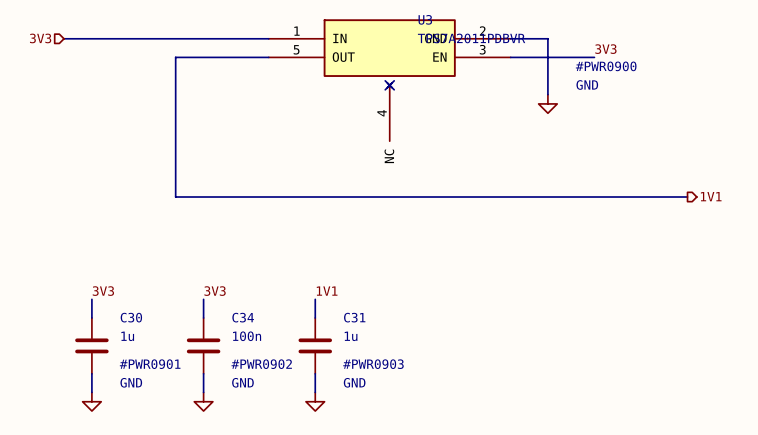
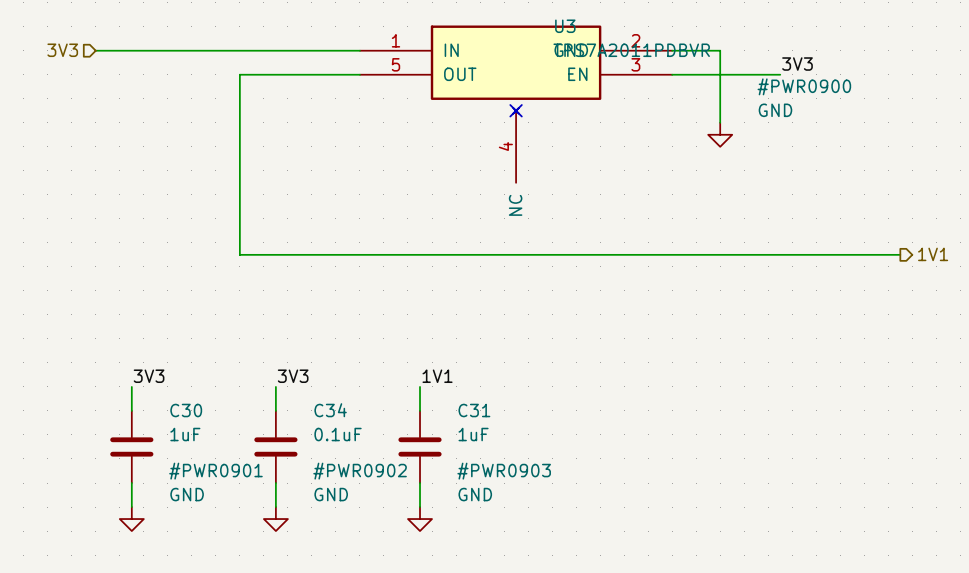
C30 value: 1u (127, 336) -> 1uF (185, 434)
C34 value: 100n (247, 336) -> 0.1uF (338, 434)
C31 value: 1u (351, 336) -> 1uF (473, 434)

